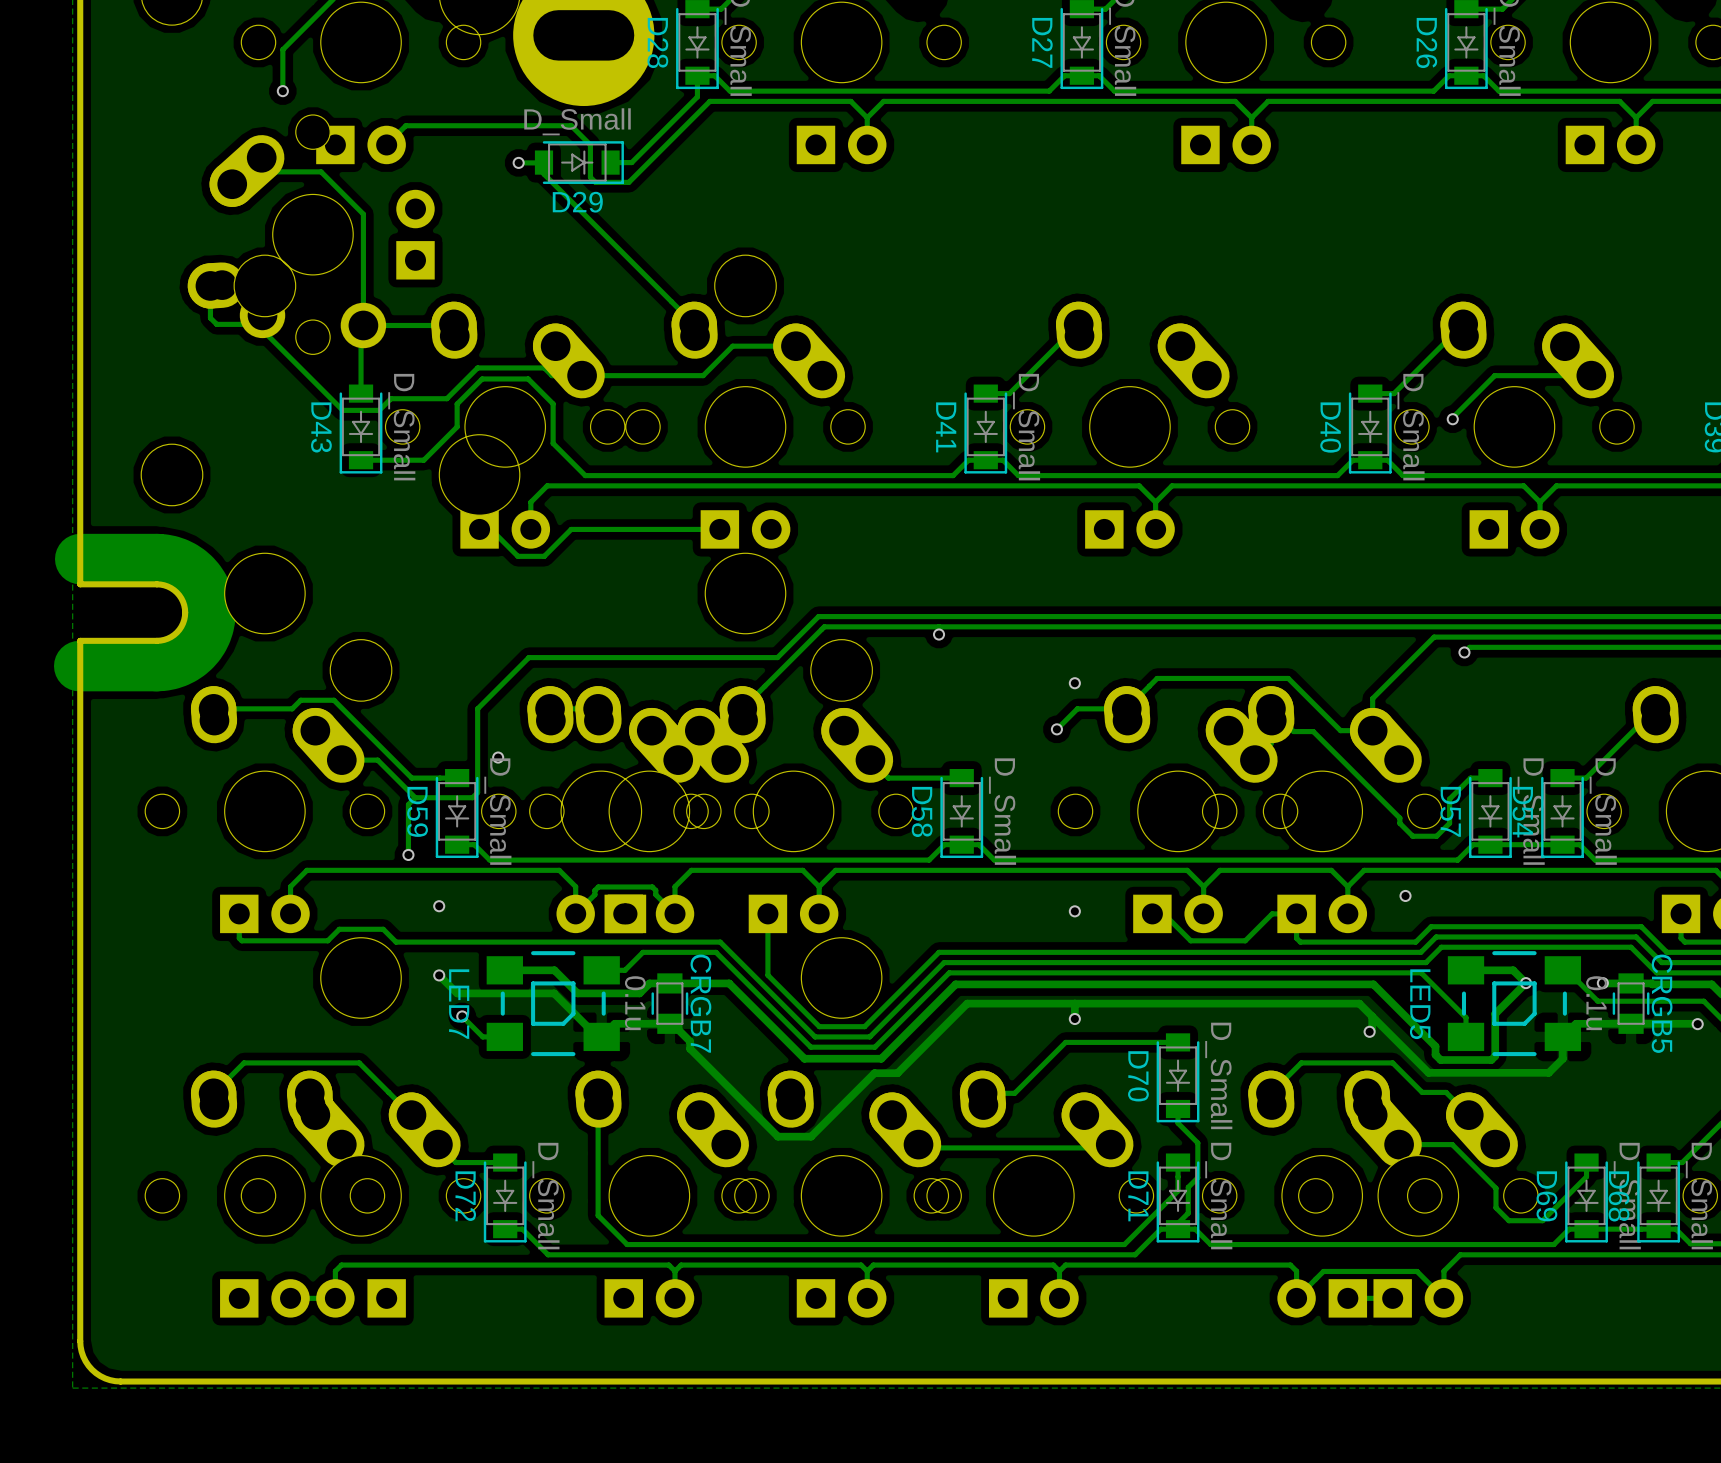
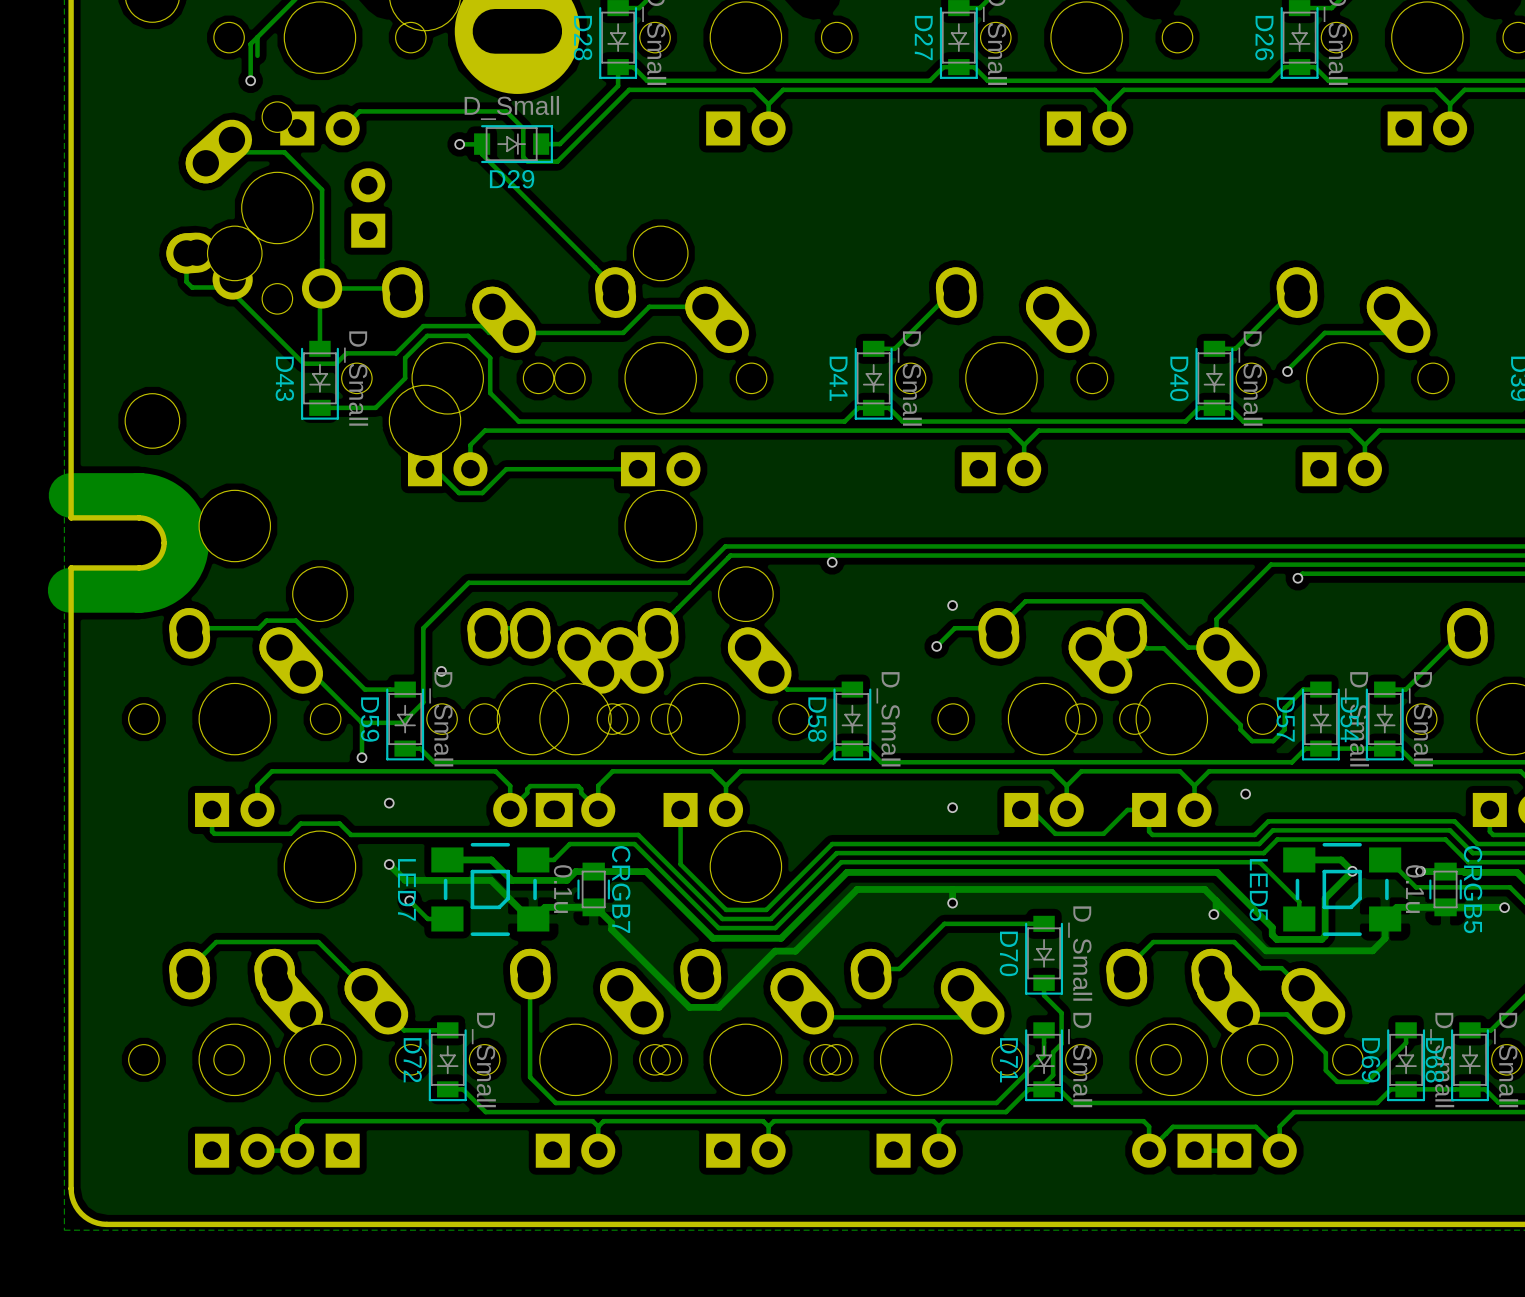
track: none -> (257, 37) (257, 55)
track: (352, 760) (377, 760) (415, 797) -> (312, 673) (361, 722) (402, 722) (418, 707)
track: (415, 797) (408, 804) (408, 815) -> none
track: (472, 797) (415, 797) -> none

